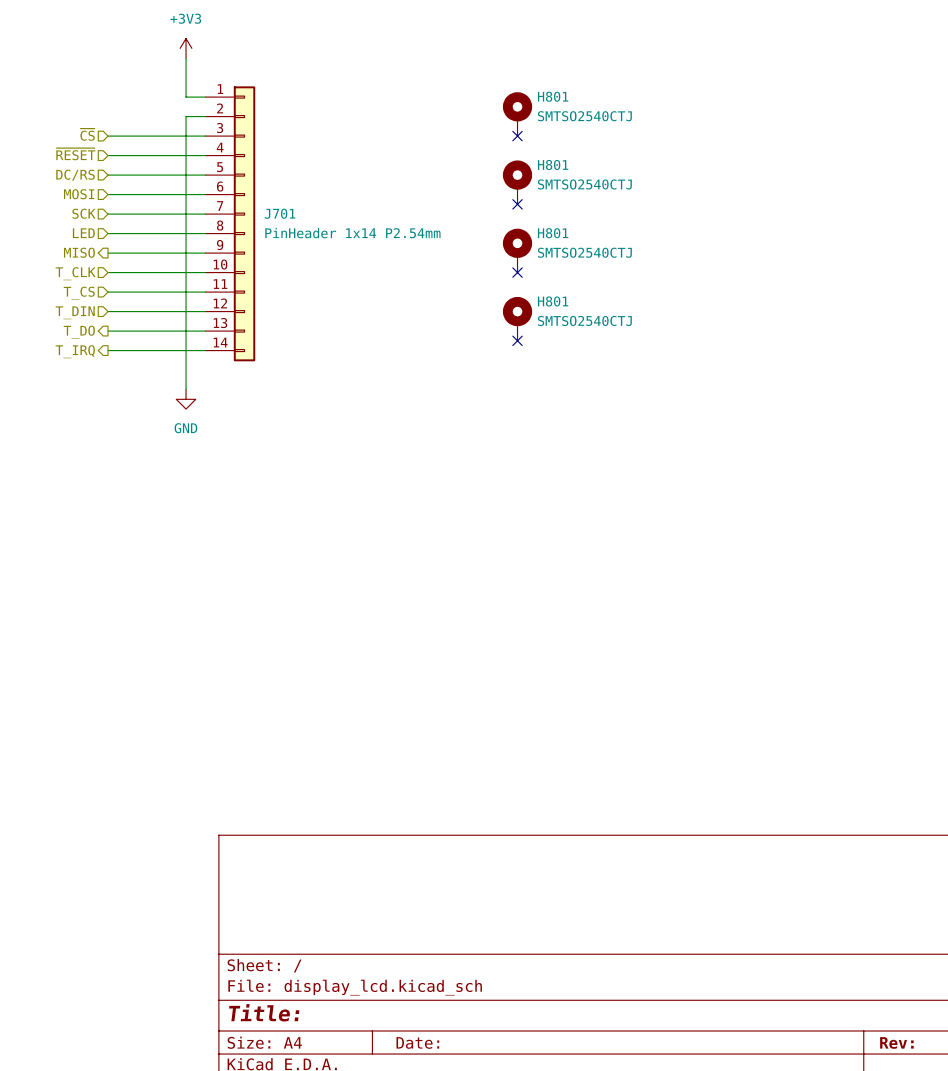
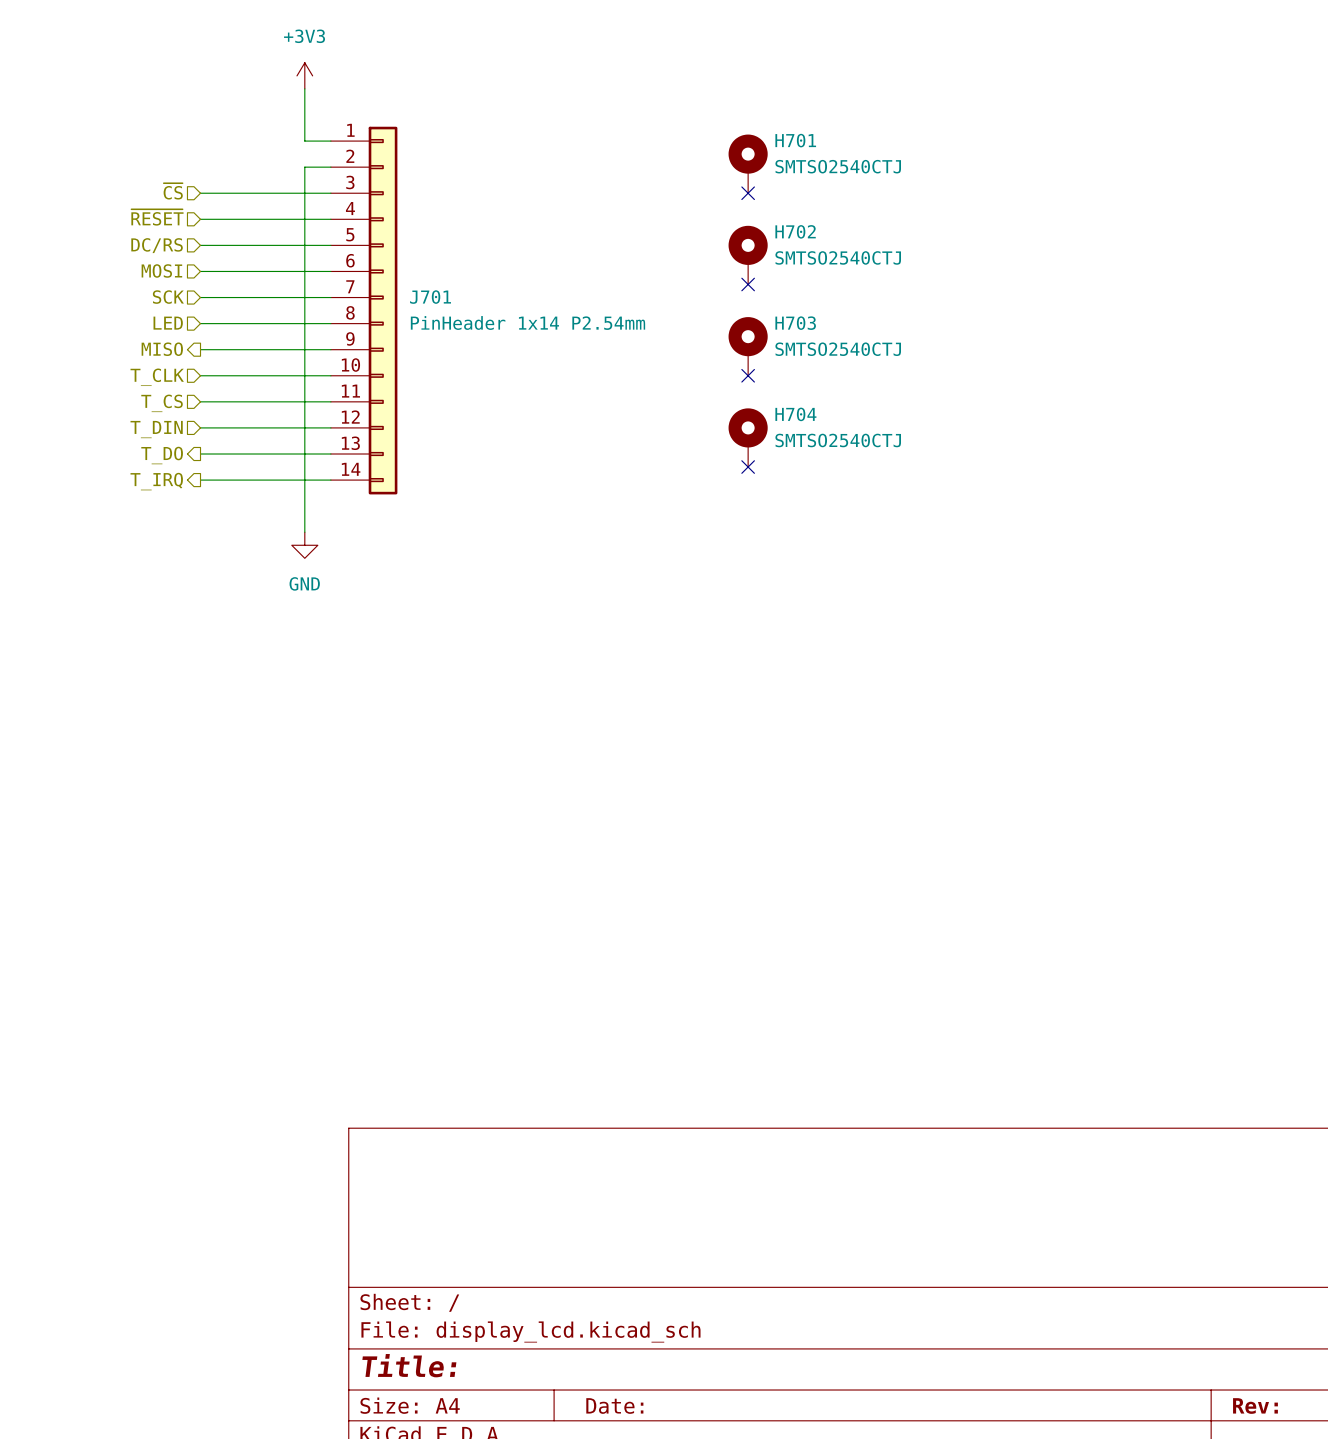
H801 name: H801 (553, 96) -> H701 (795, 140)
H801 name: H801 (553, 164) -> H702 (795, 231)
H801 name: H801 (553, 233) -> H703 (795, 323)
H801 name: H801 (553, 301) -> H704 (795, 414)

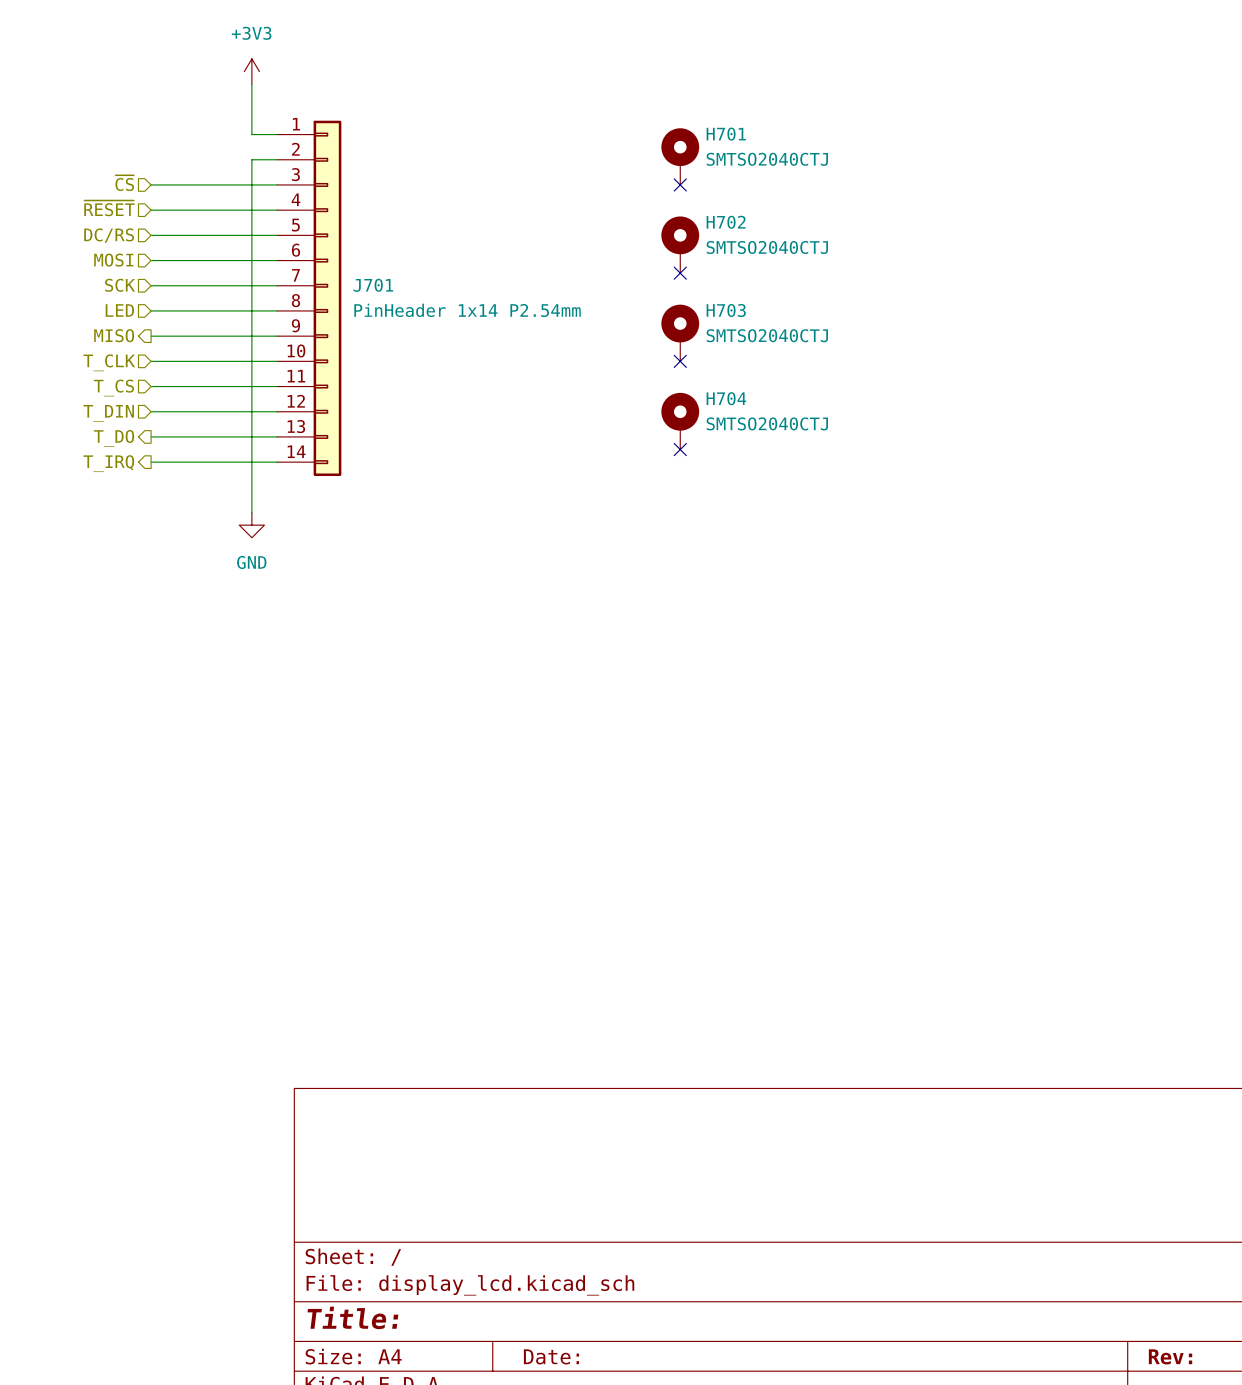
H701 value: SMTSO2540CTJ (838, 166) -> SMTSO2040CTJ (767, 159)
H702 value: SMTSO2540CTJ (838, 257) -> SMTSO2040CTJ (767, 247)
H703 value: SMTSO2540CTJ (838, 349) -> SMTSO2040CTJ (767, 335)
H704 value: SMTSO2540CTJ (838, 440) -> SMTSO2040CTJ (767, 423)

